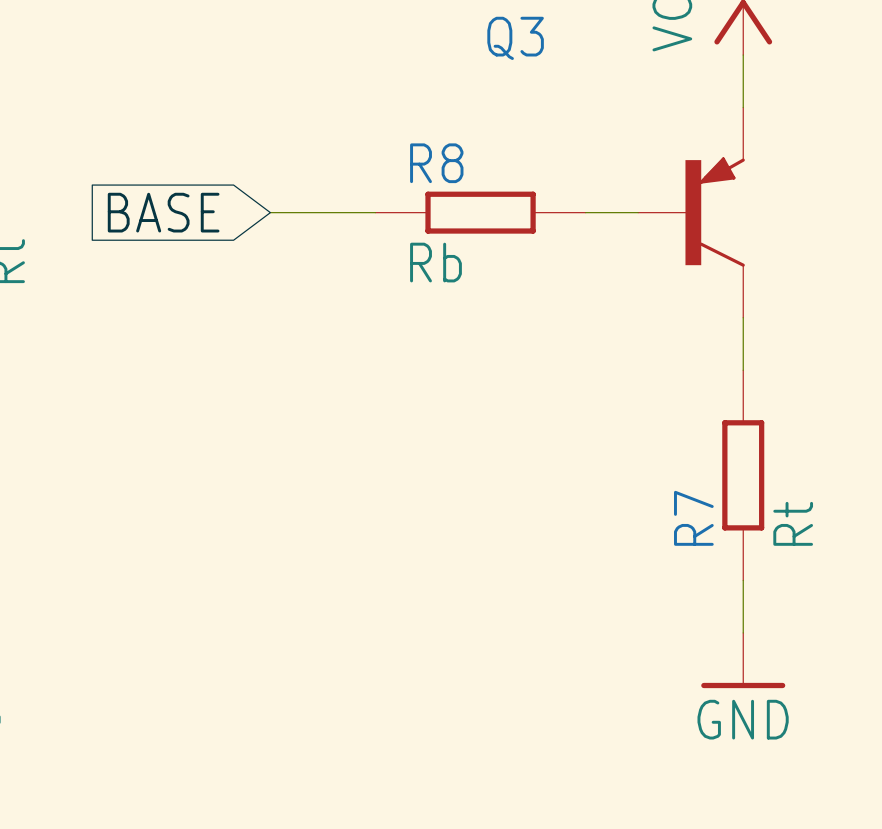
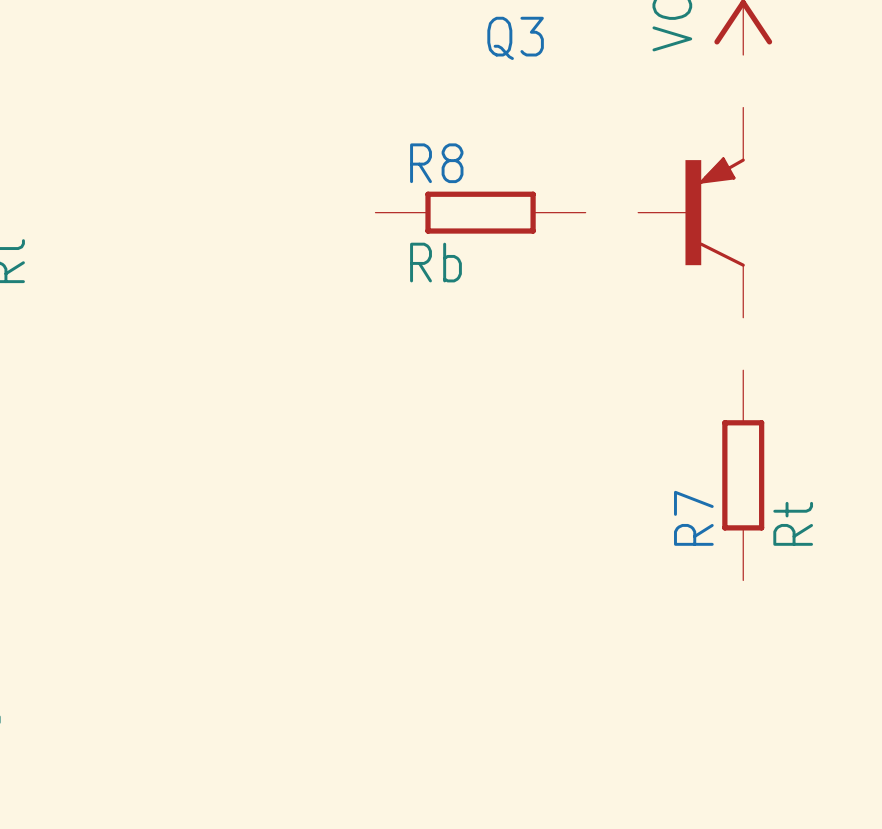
wire: (743, 55) (743, 107) -> none
global label: BASE (163, 212) -> none
wire: (270, 212) (375, 212) -> none
wire: (585, 212) (638, 212) -> none
wire: (743, 317) (743, 370) -> none
wire: (743, 580) (743, 632) -> none
power symbol: GND (743, 660) -> none

